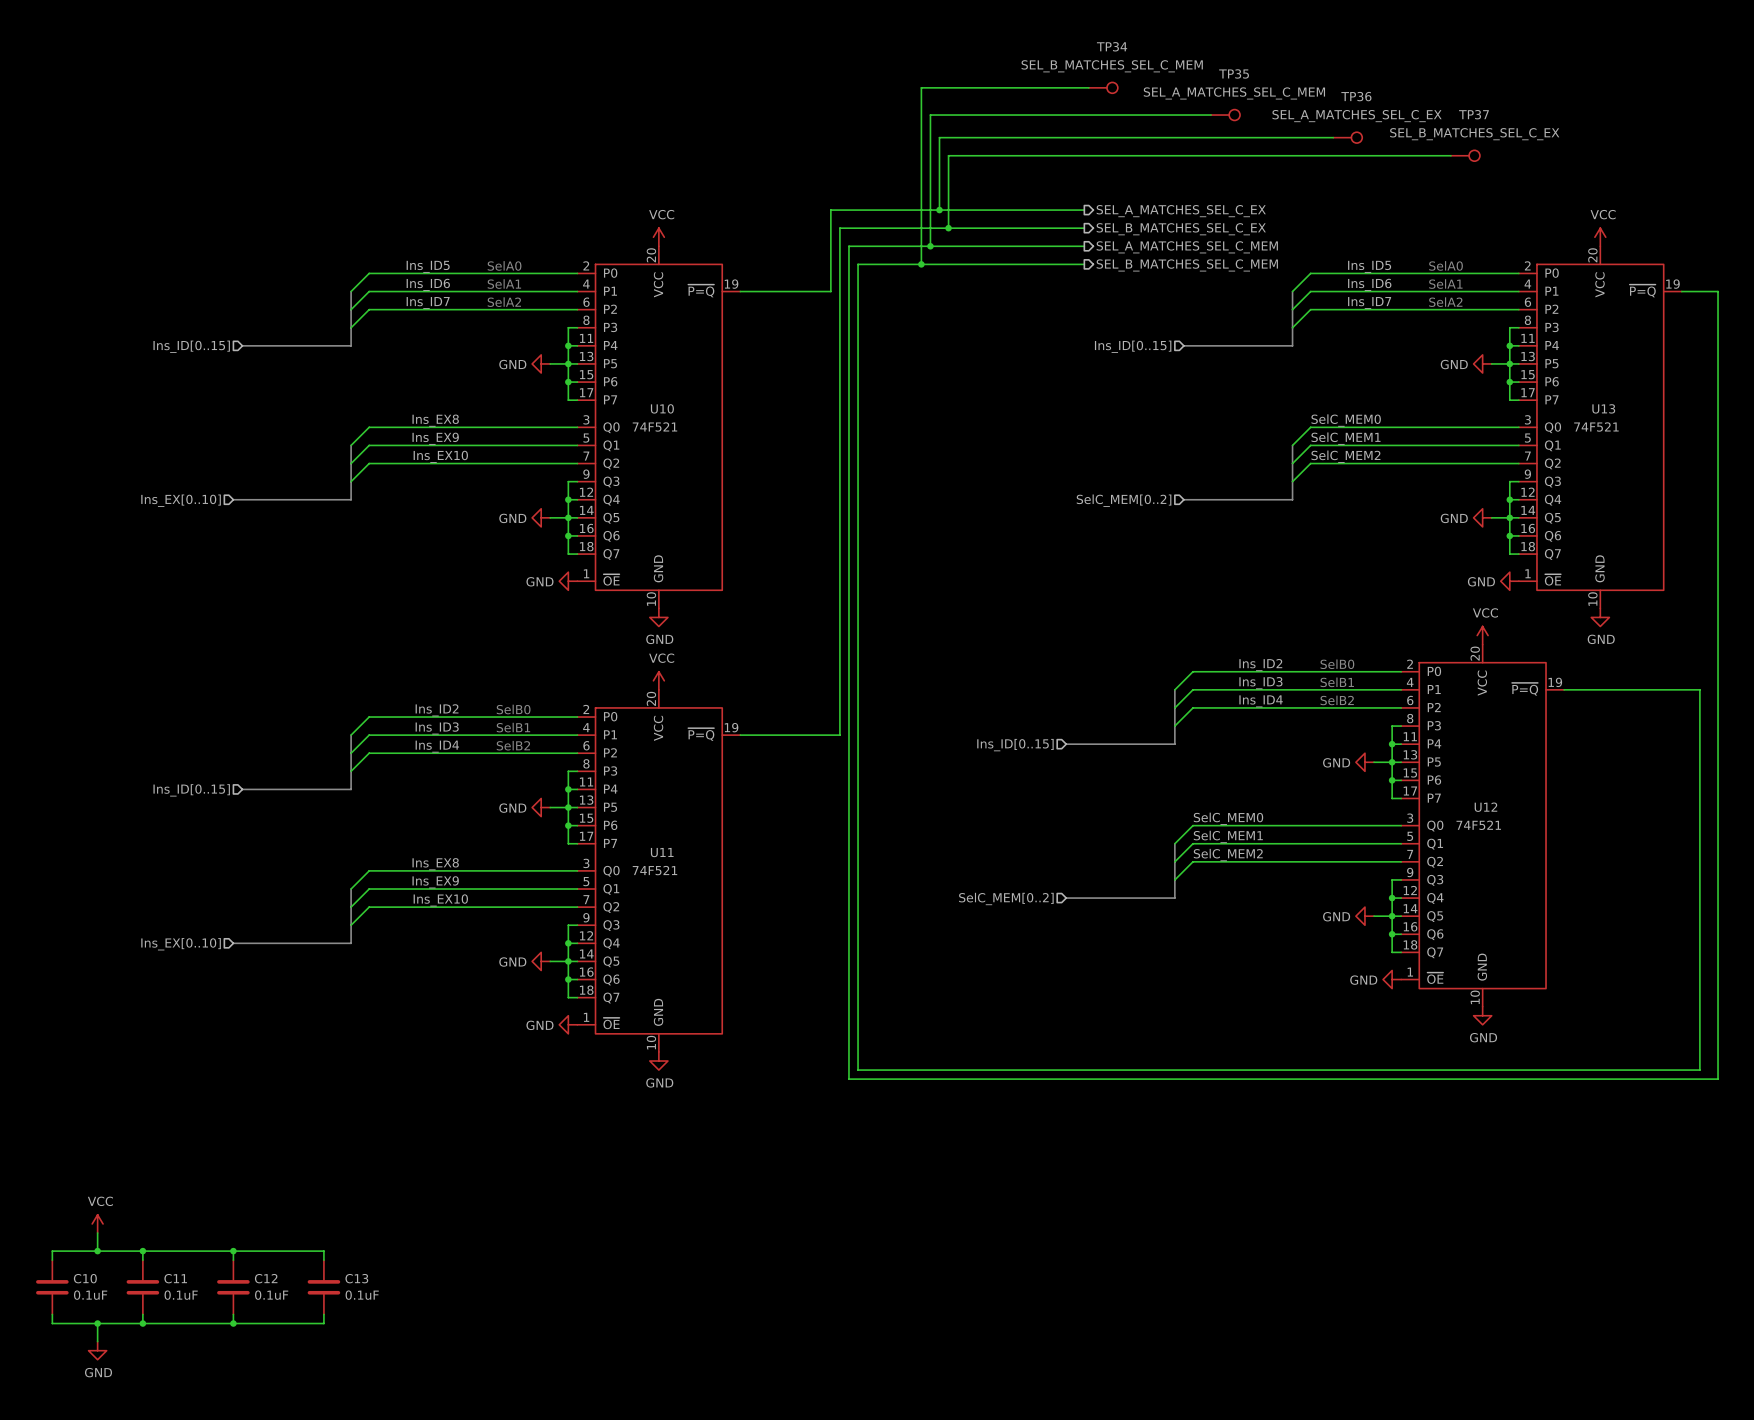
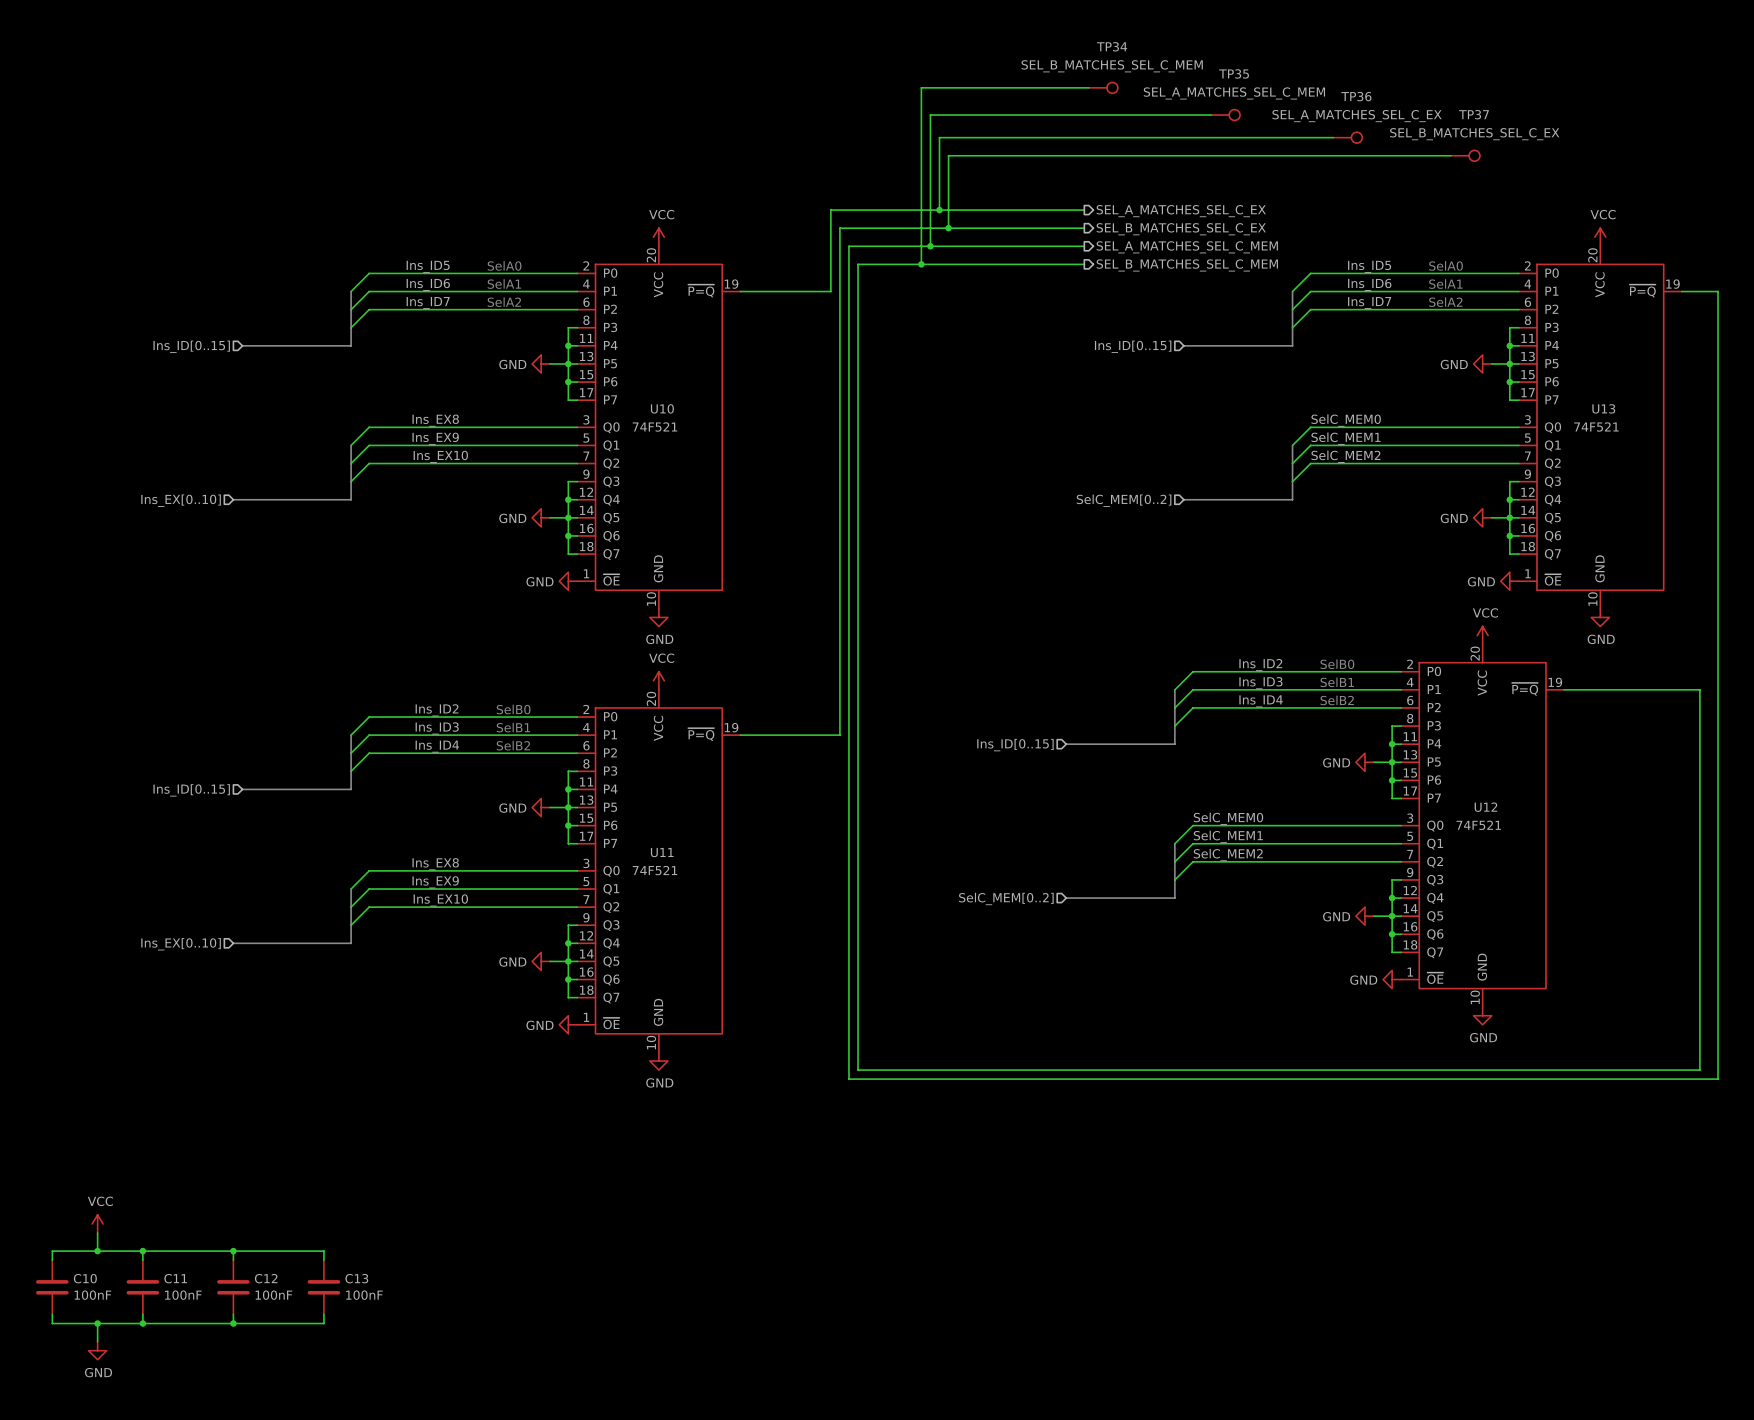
C10 value: 0.1uF (90, 1295) -> 100nF (92, 1295)
C11 value: 0.1uF (181, 1295) -> 100nF (183, 1295)
C12 value: 0.1uF (271, 1295) -> 100nF (273, 1295)
C13 value: 0.1uF (362, 1295) -> 100nF (364, 1295)

